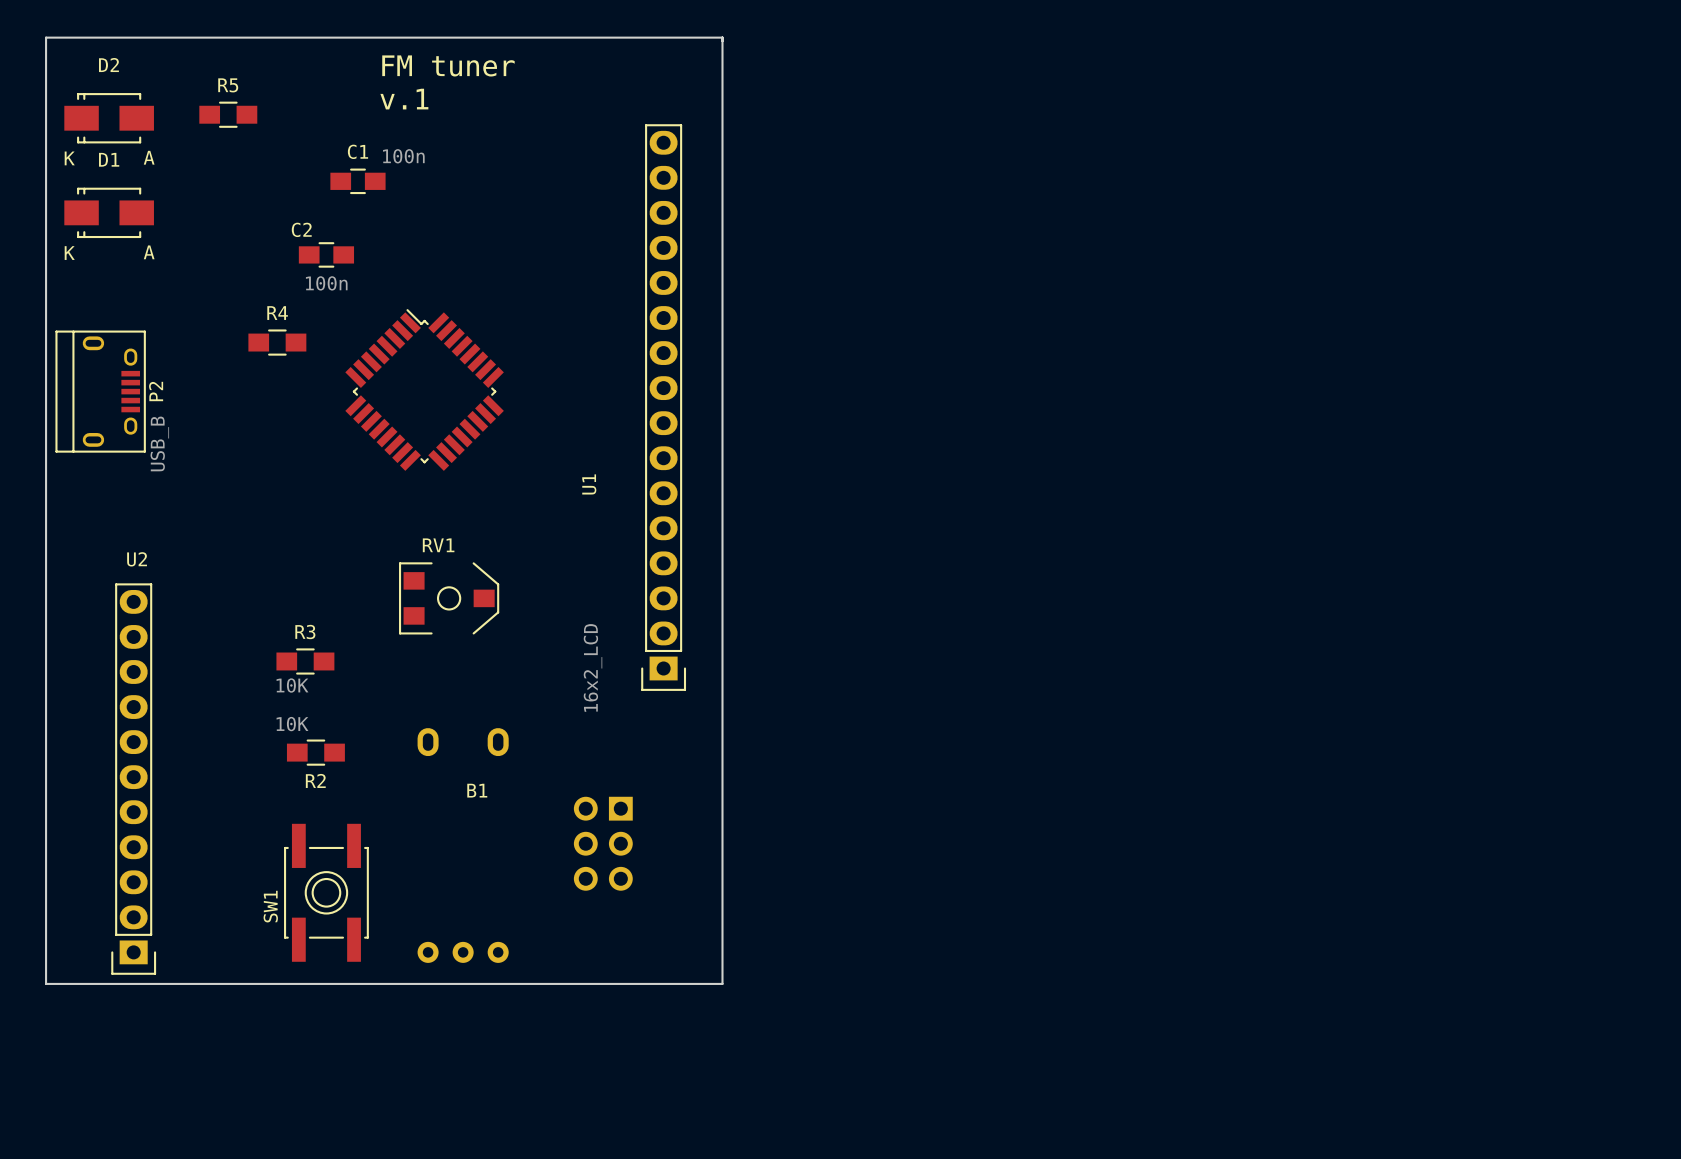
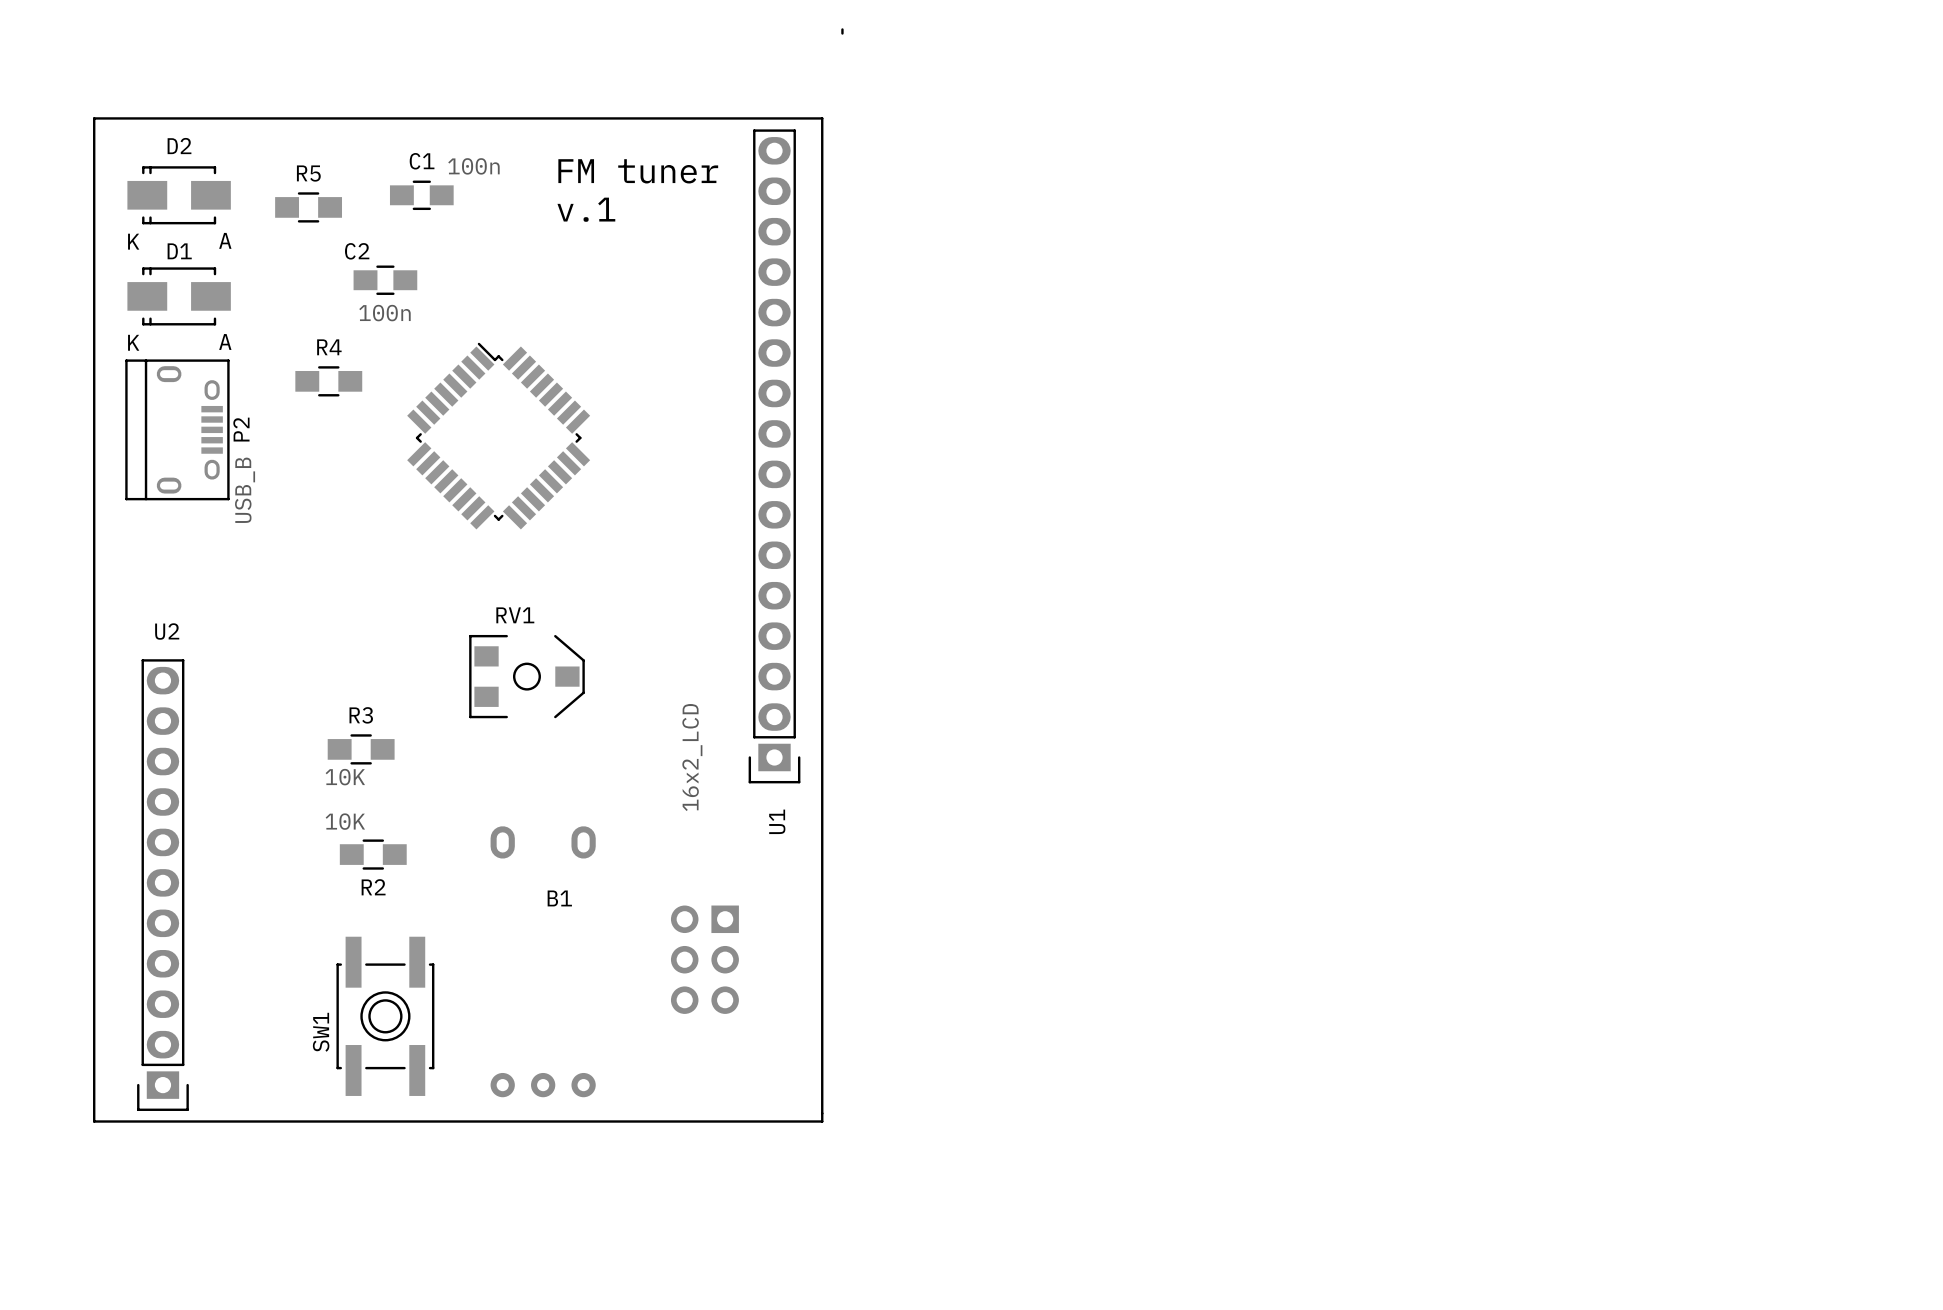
board edge: (722, 37) (46, 37) (46, 983) (74, 983) -> (822, 1121) (822, 118) (94, 118) (94, 1121)
board edge: (722, 41) (722, 983) (704, 983) -> none
D2 name position: D2 (108, 65) -> D2 (179, 146)
text position: FM tuner (448, 65) -> FM tuner (638, 171)
text position: v.1 (404, 99) -> v.1 (586, 209)
R5 position: (228, 114) -> (308, 207)
D2 position: (109, 118) -> (179, 195)
D1 name position: D1 (109, 159) -> D1 (179, 251)
D1 position: (109, 212) -> (179, 296)
P2 position: (100, 391) -> (177, 429)
U1 name position: U1 (589, 484) -> U1 (777, 821)

